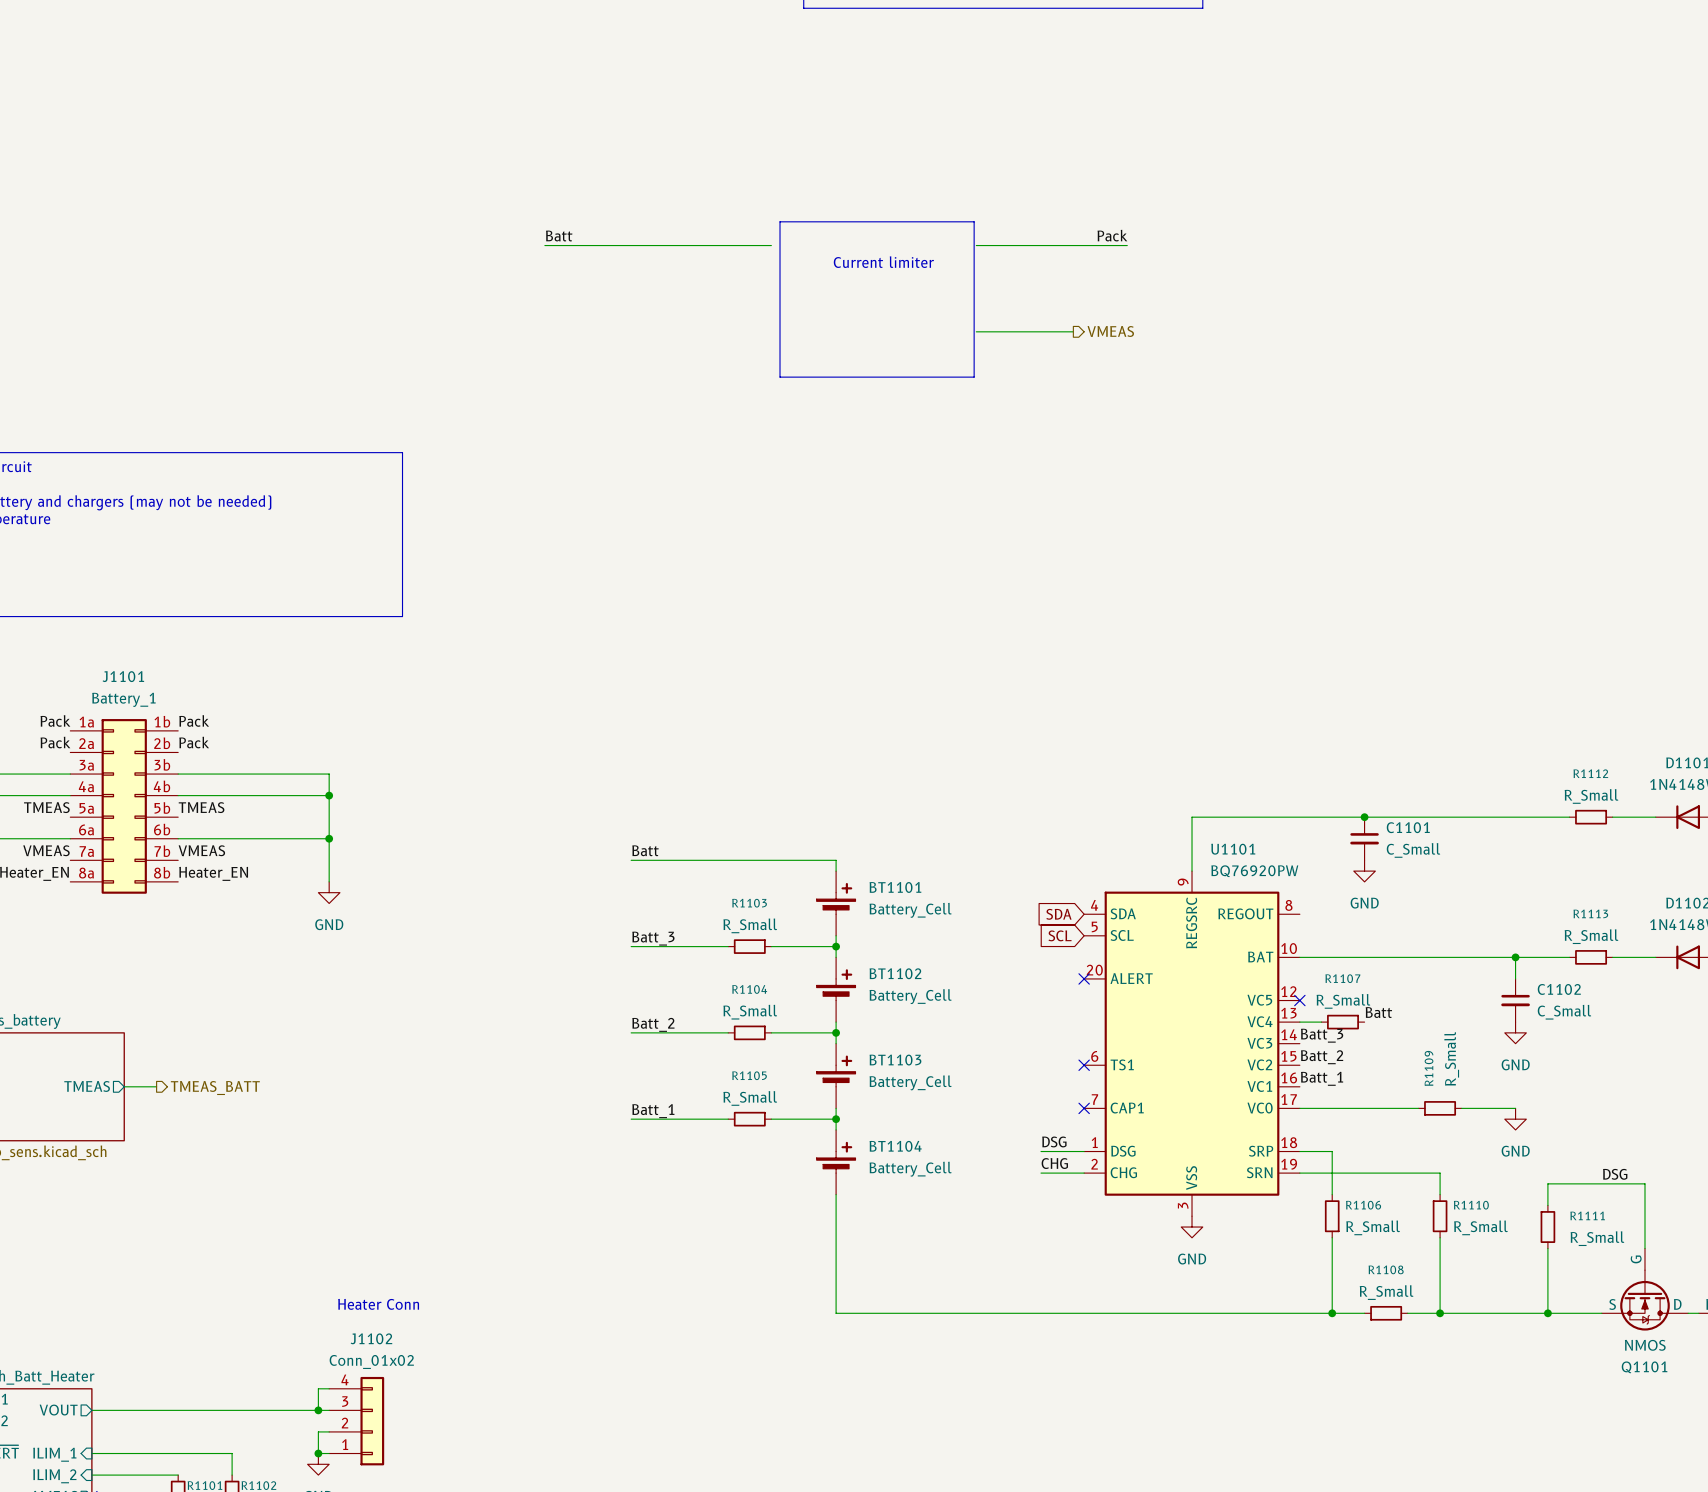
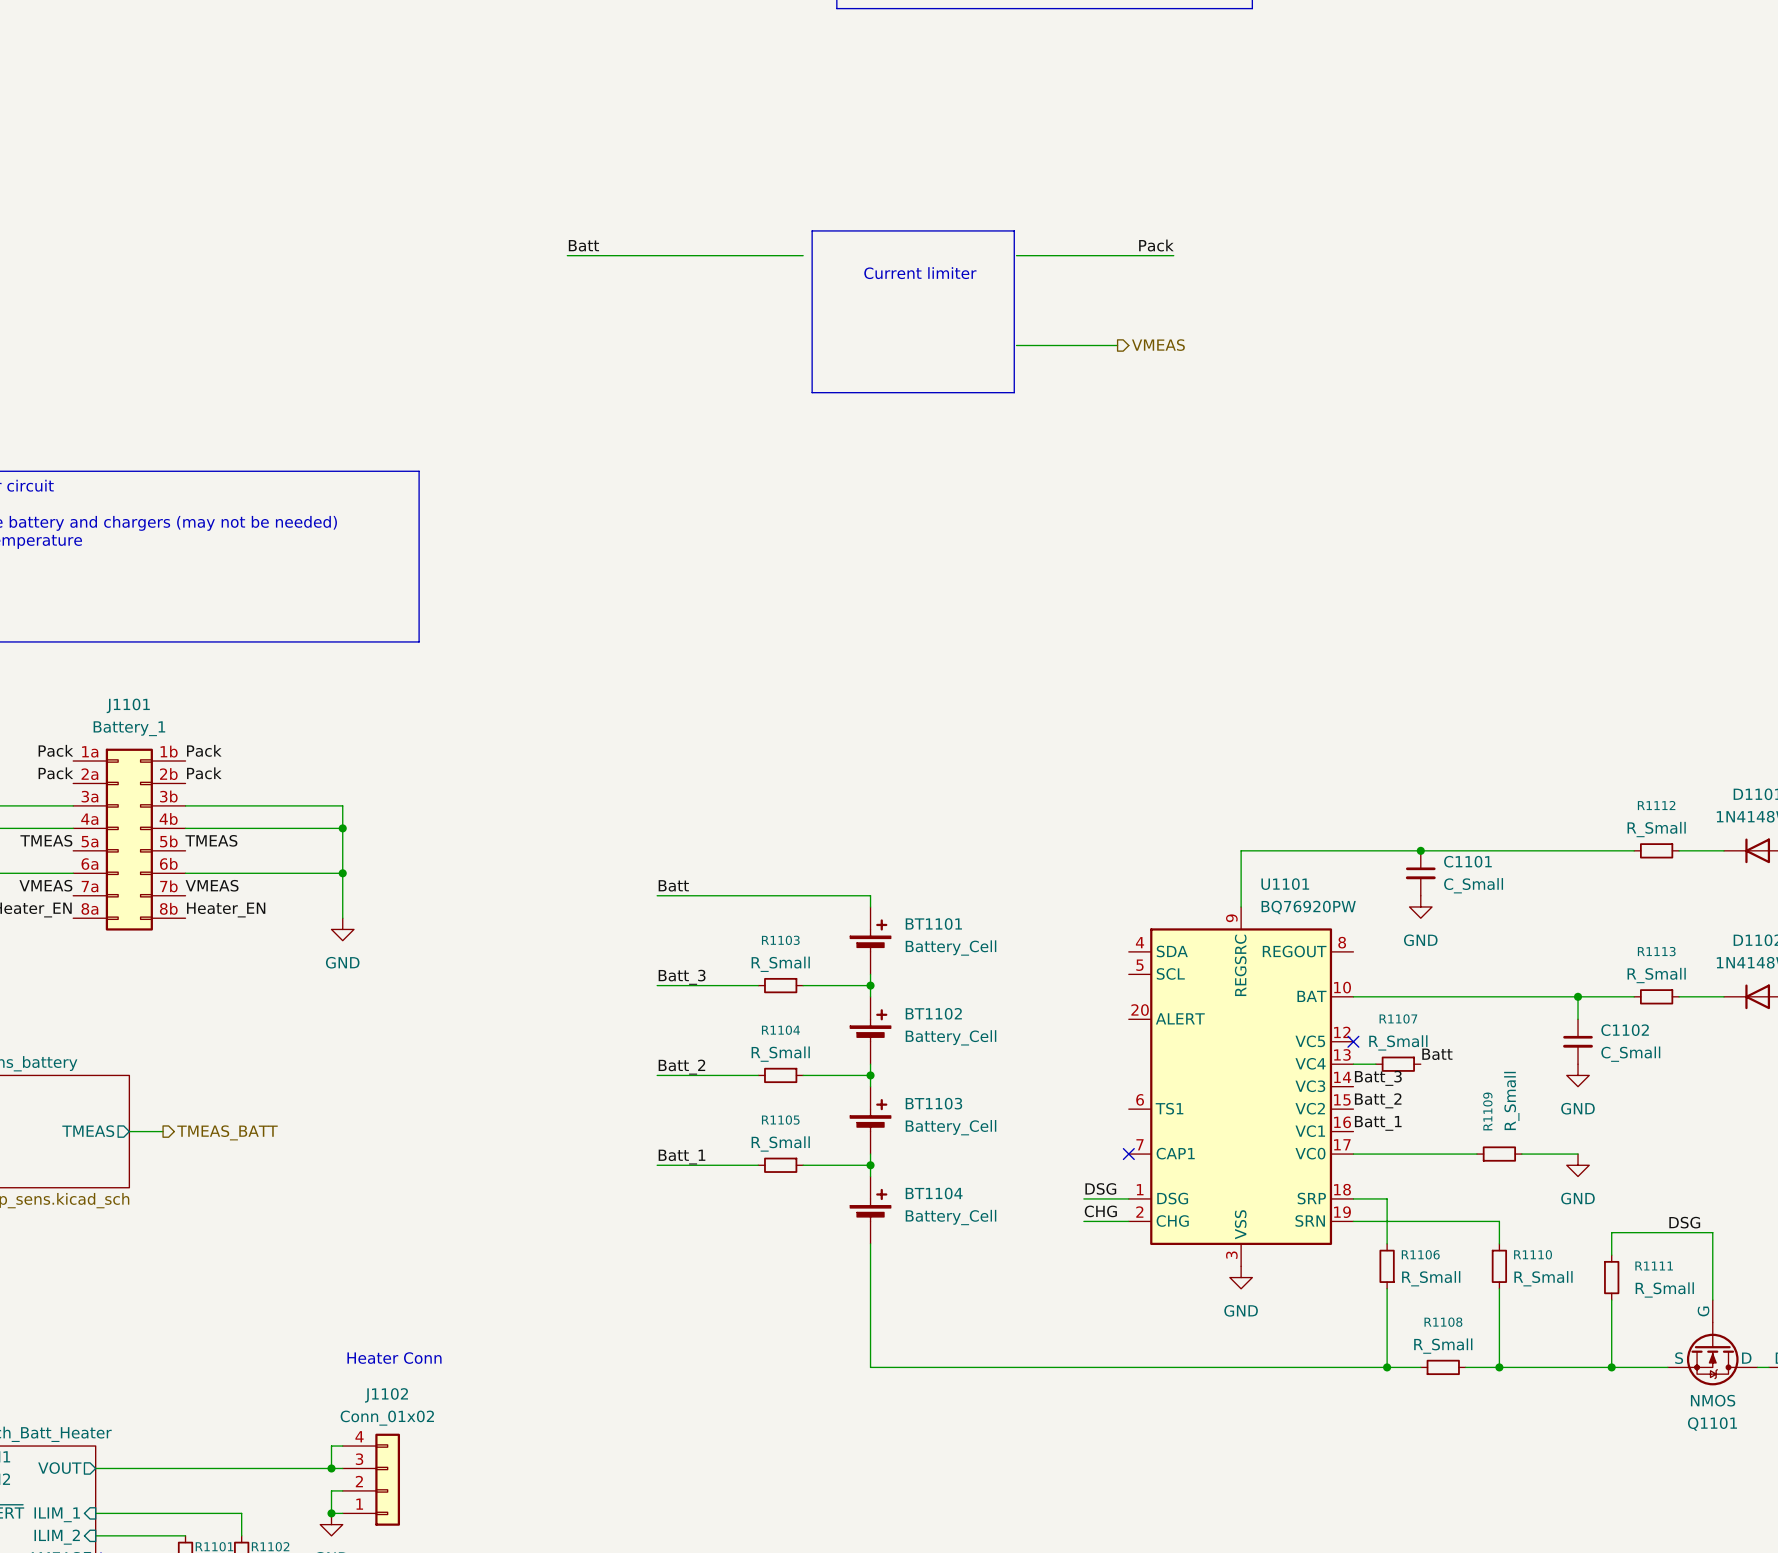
global label: SDA (1058, 914) -> none
global label: SCL (1060, 935) -> none
no-connect mark: (1084, 978) -> none
no-connect mark: (1084, 1065) -> none

